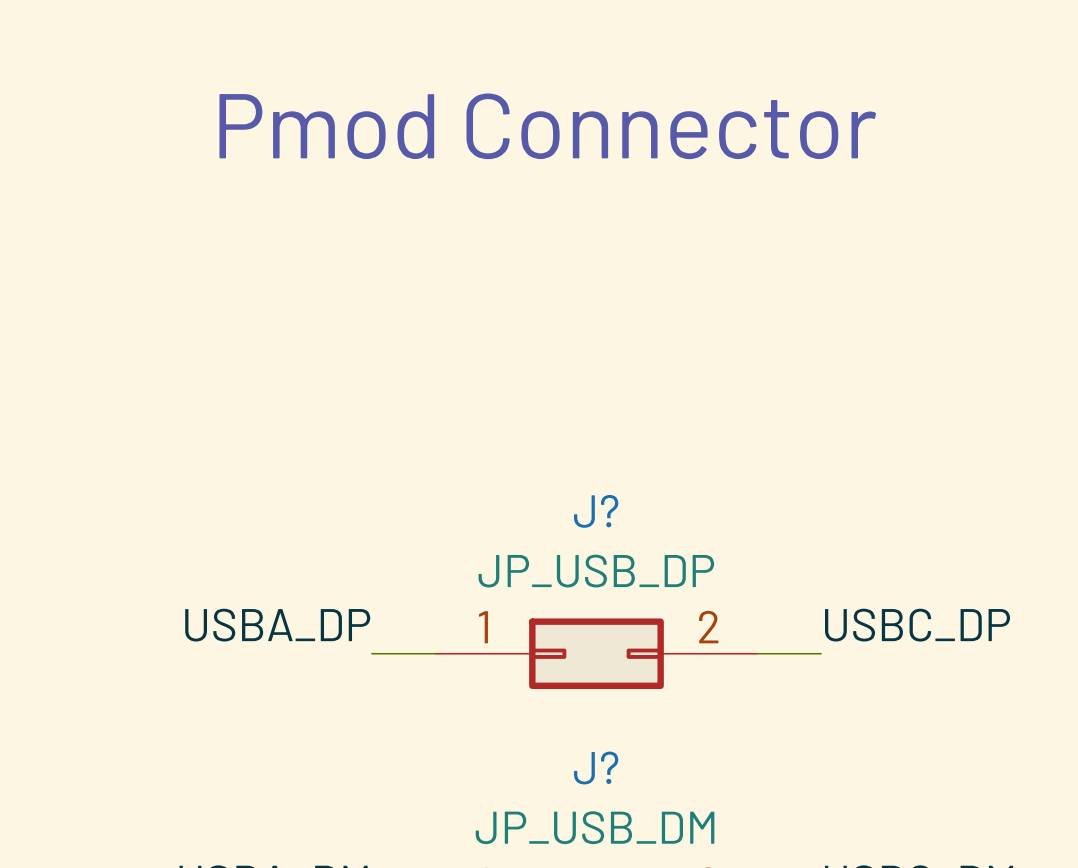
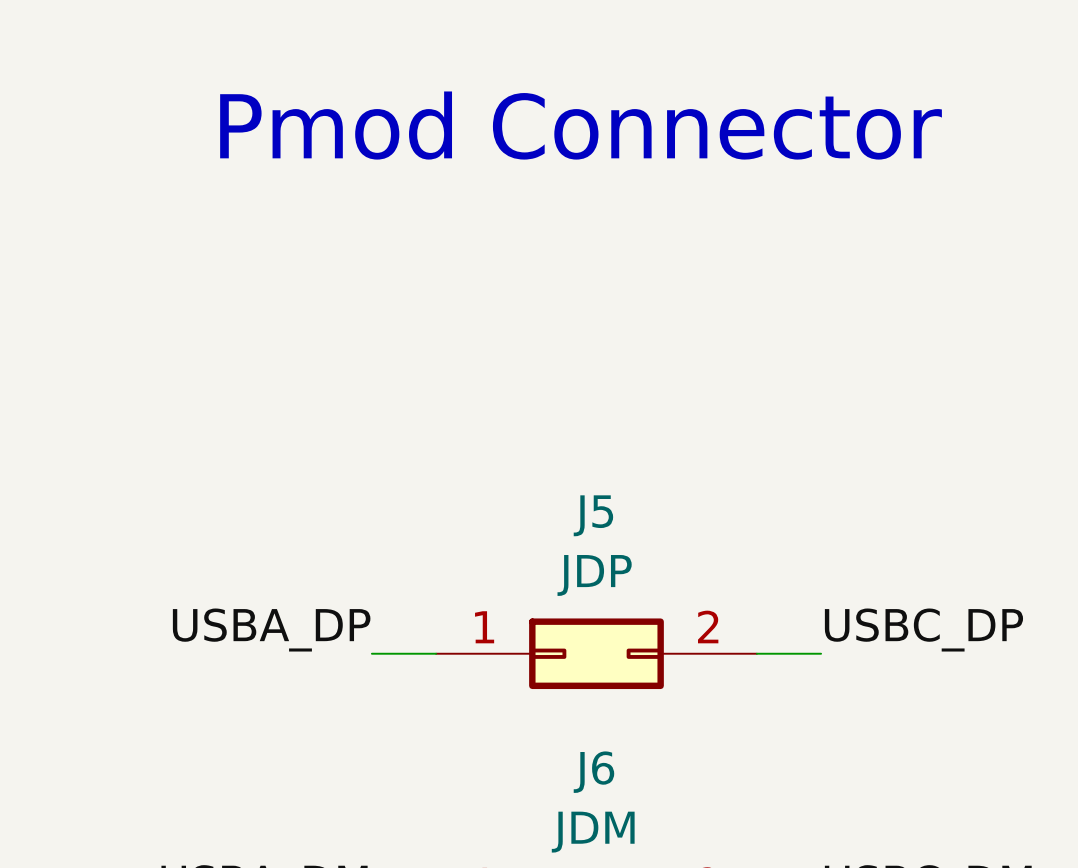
J? name: J? (596, 511) -> J5 (593, 515)
J? value: JP_USB_DP (596, 571) -> JDP (594, 575)
J? name: J? (596, 768) -> J6 (593, 772)
J? value: JP_USB_DM (595, 827) -> JDM (593, 832)

